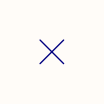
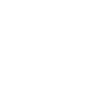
no-connect mark: (51, 51) -> none

